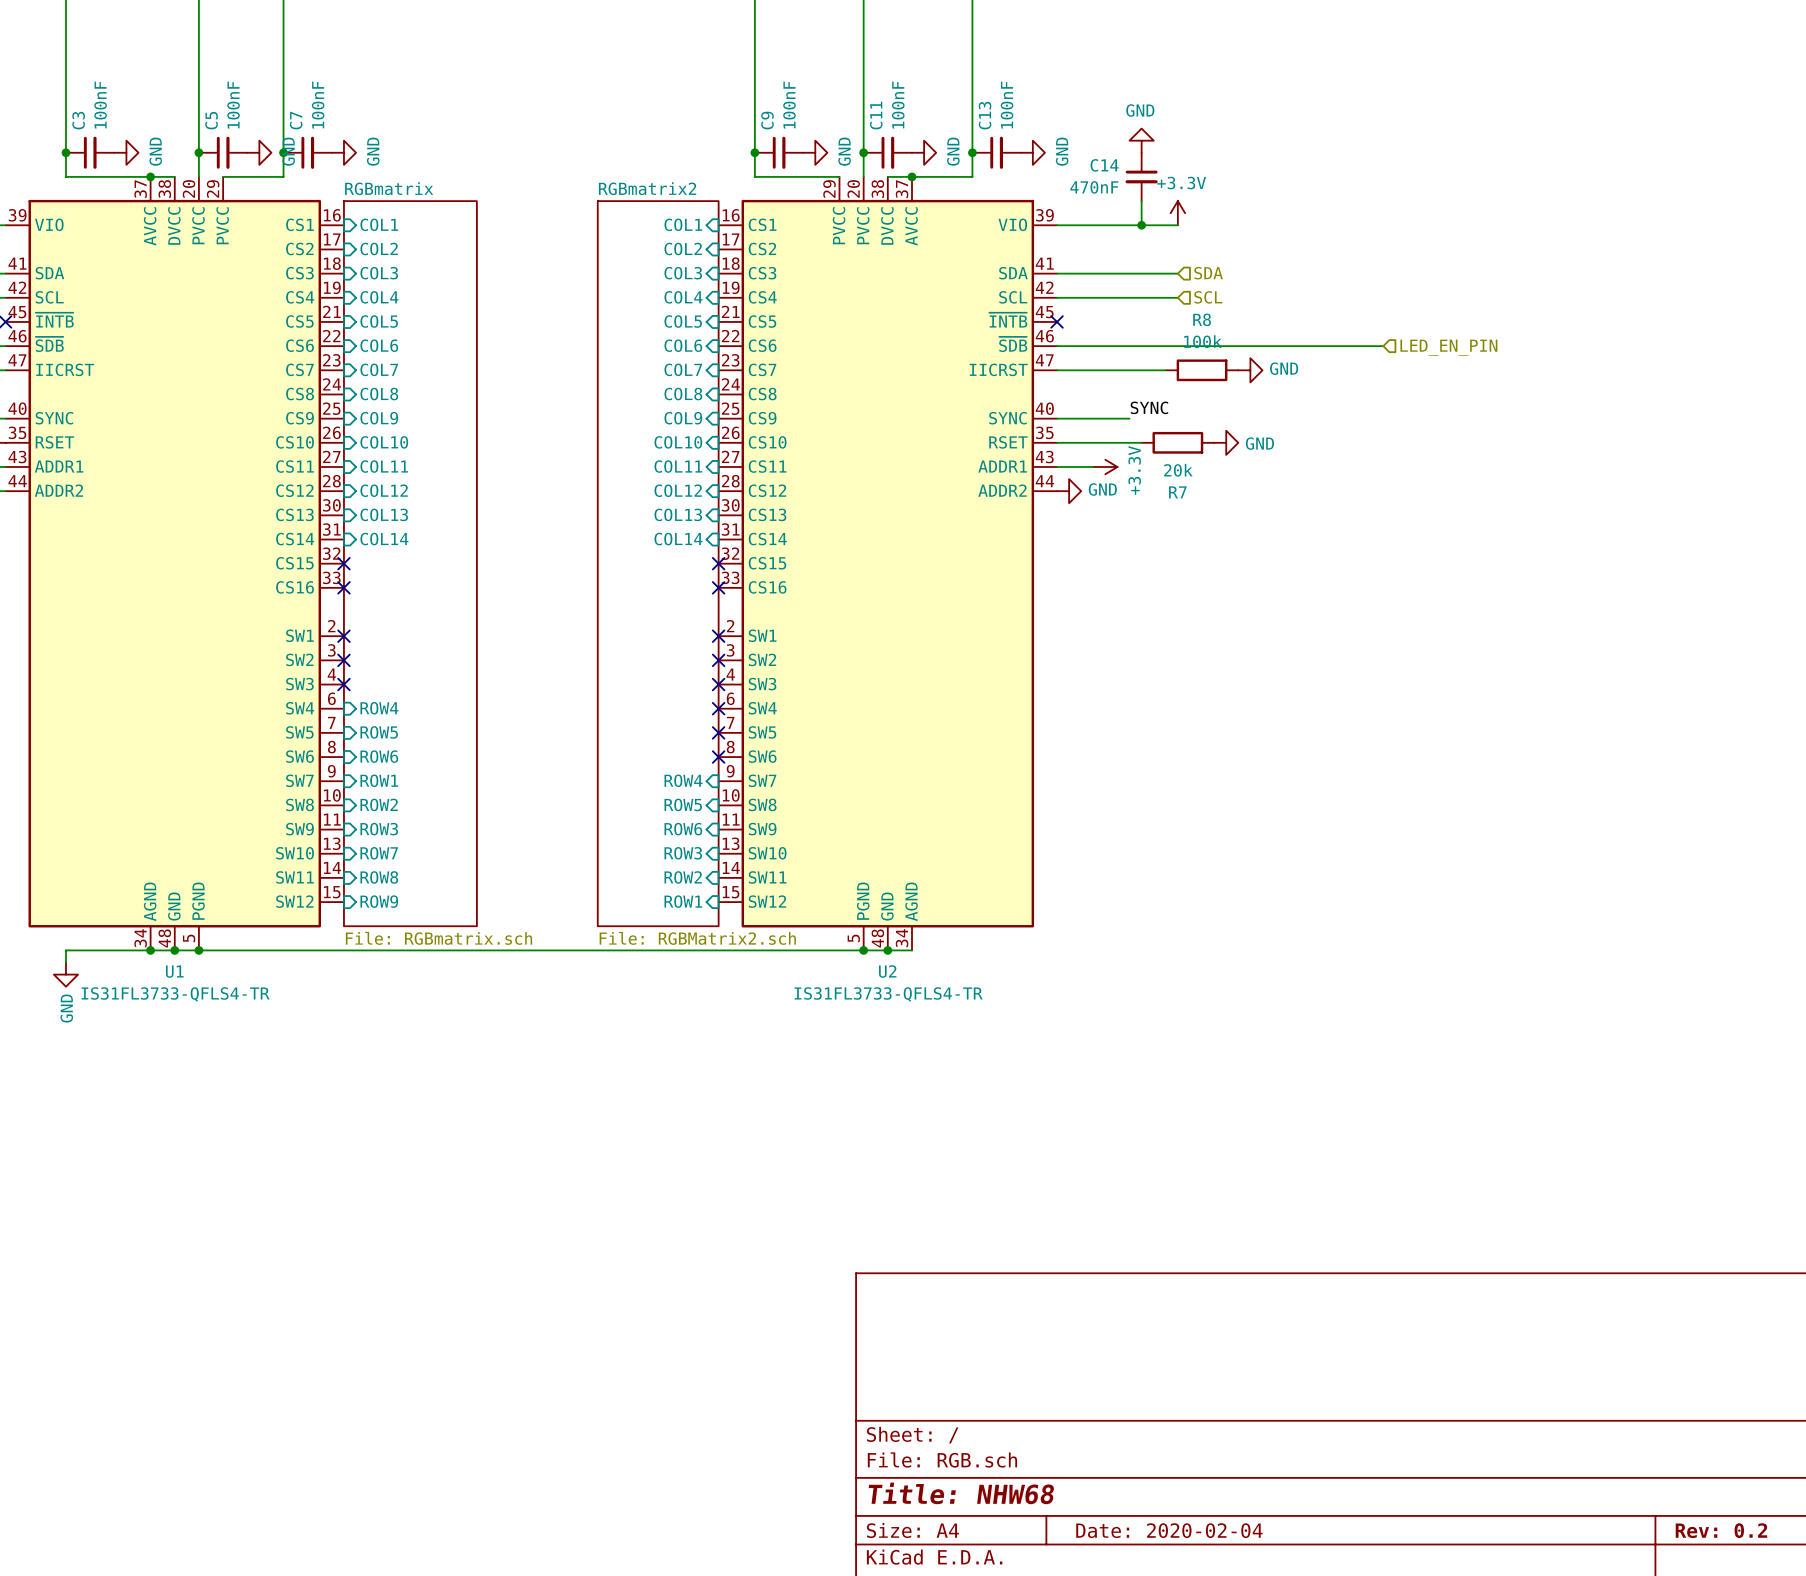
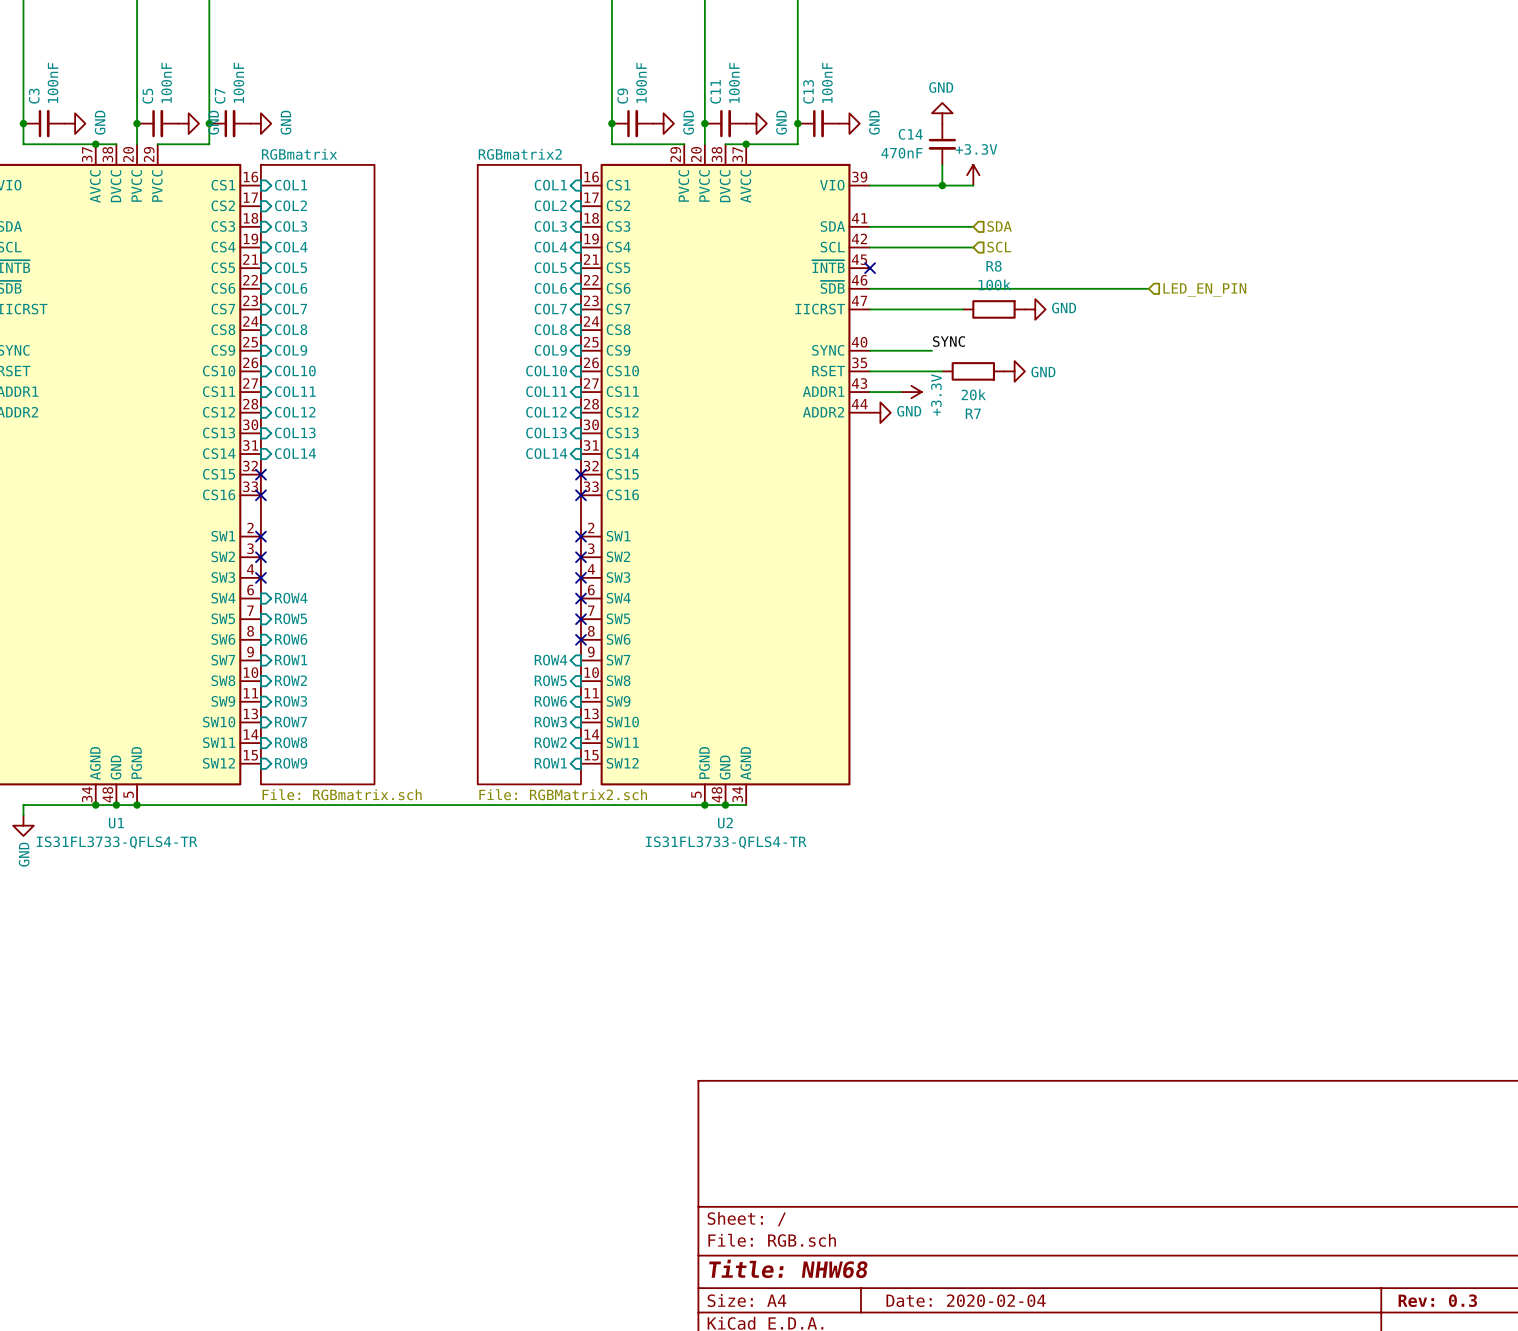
title block: Rev: 0.2 (1721, 1530) -> Rev: 0.3 (1437, 1300)

